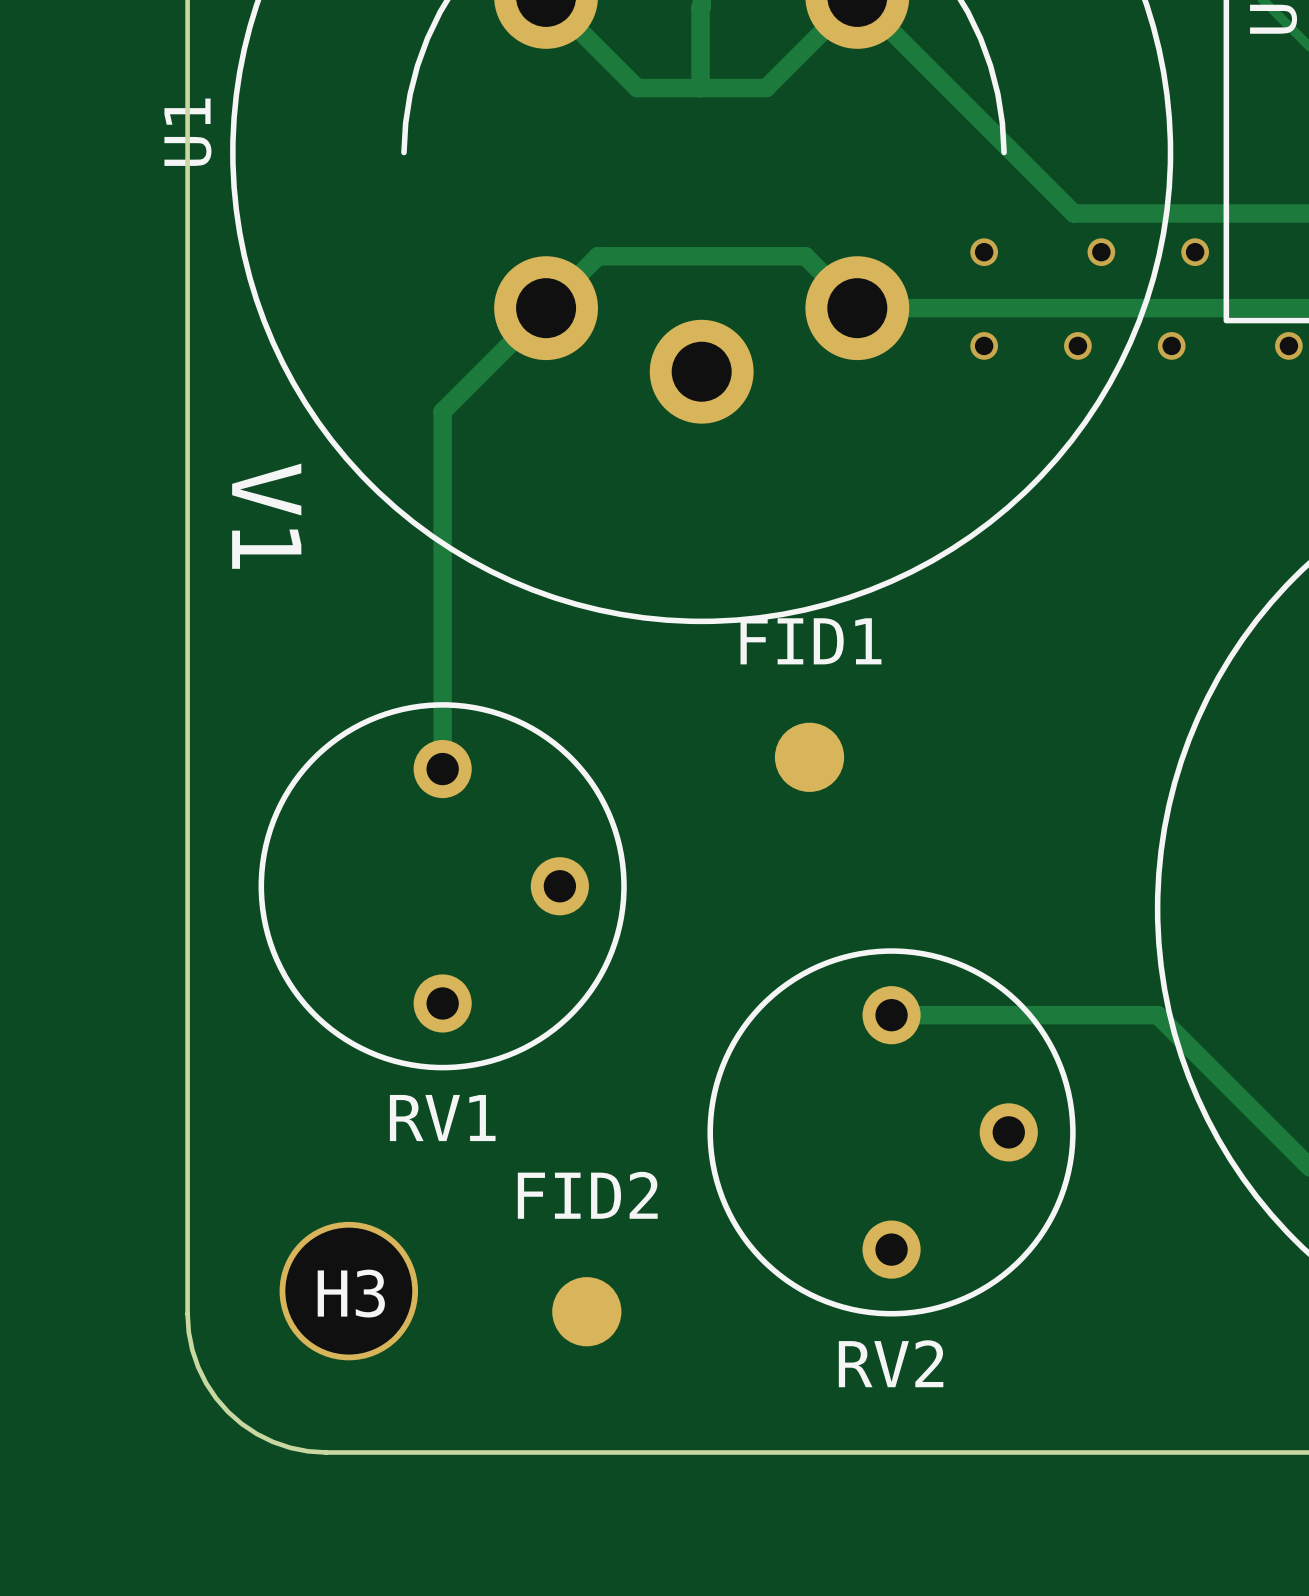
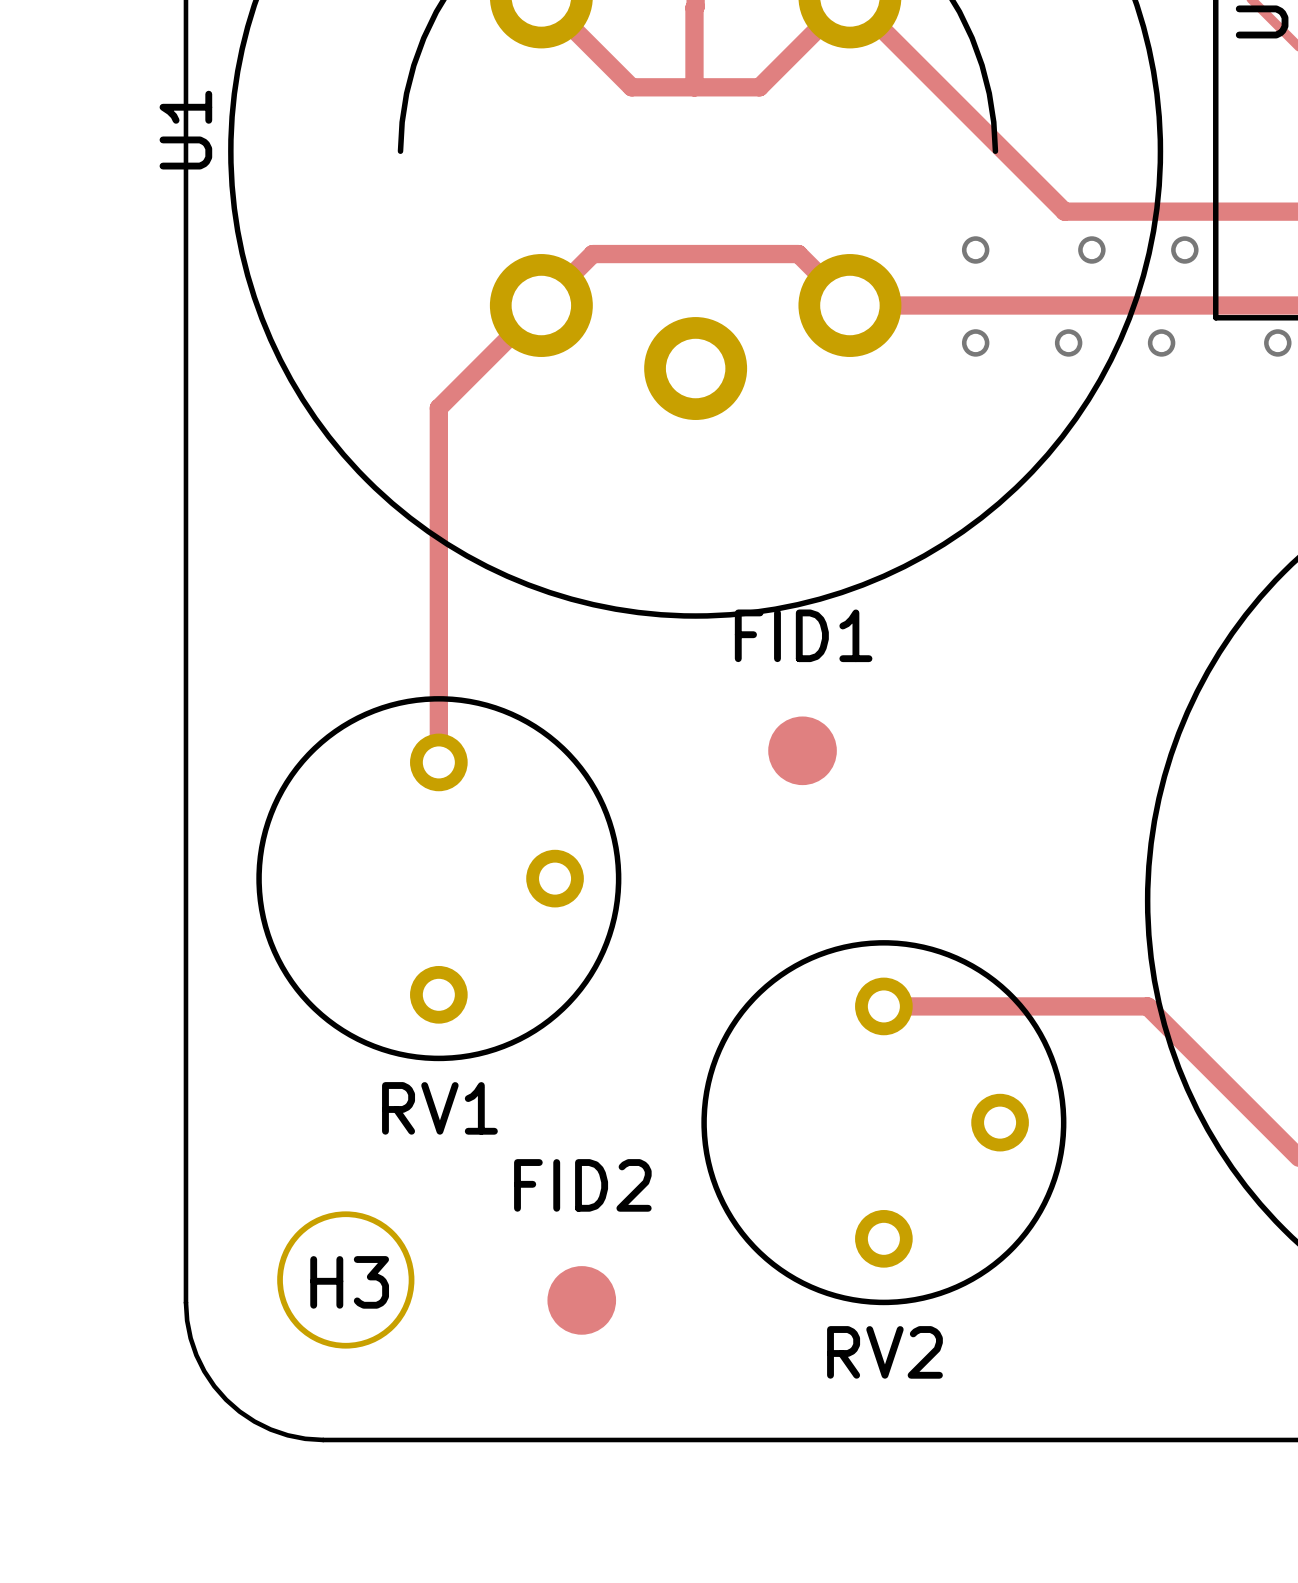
text: V1 (266, 516) -> none

